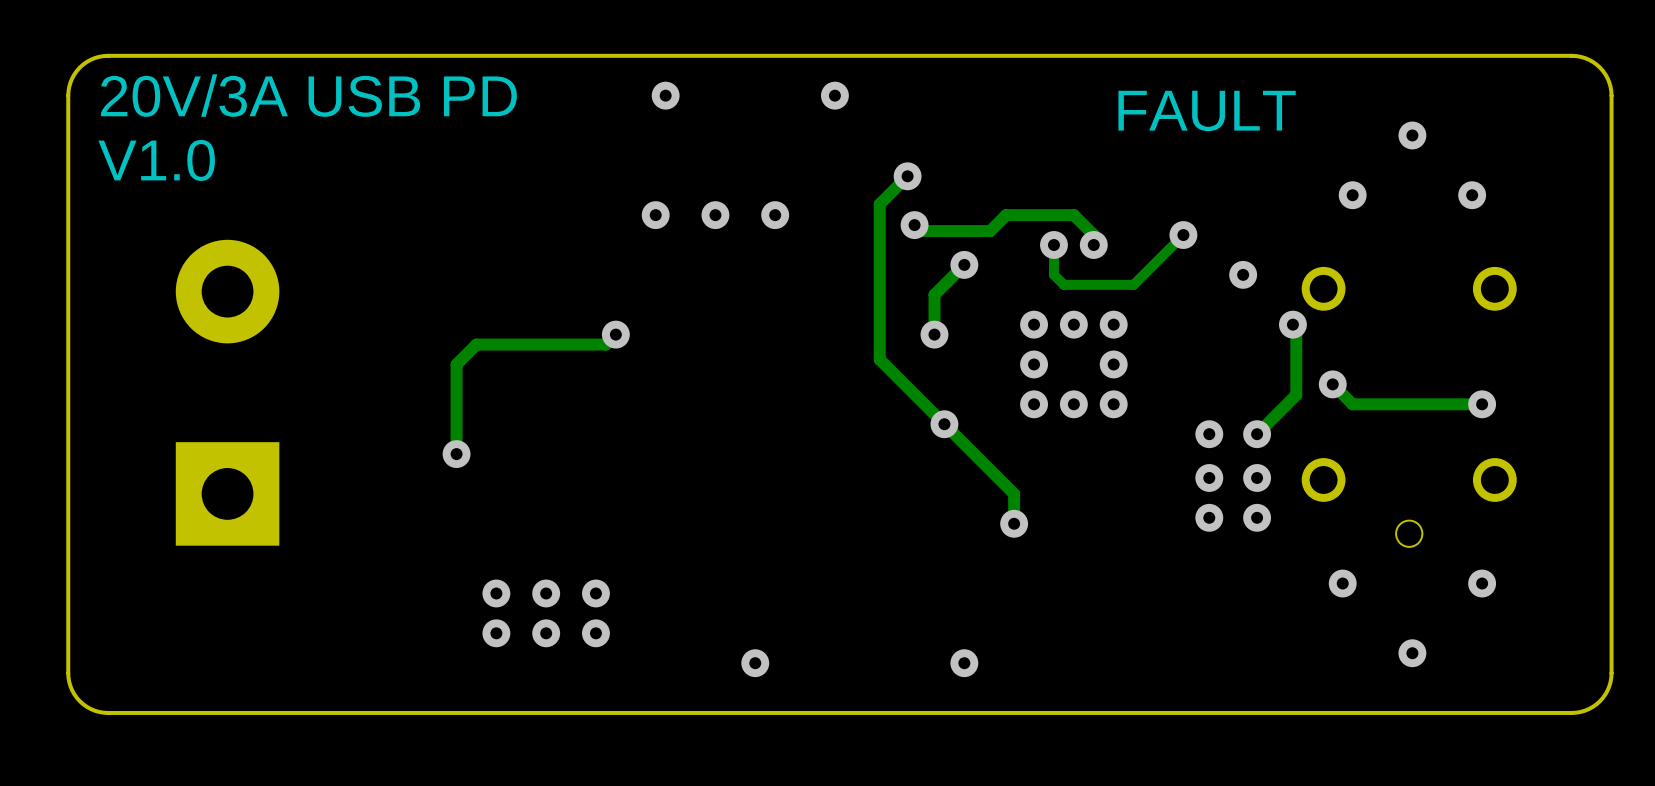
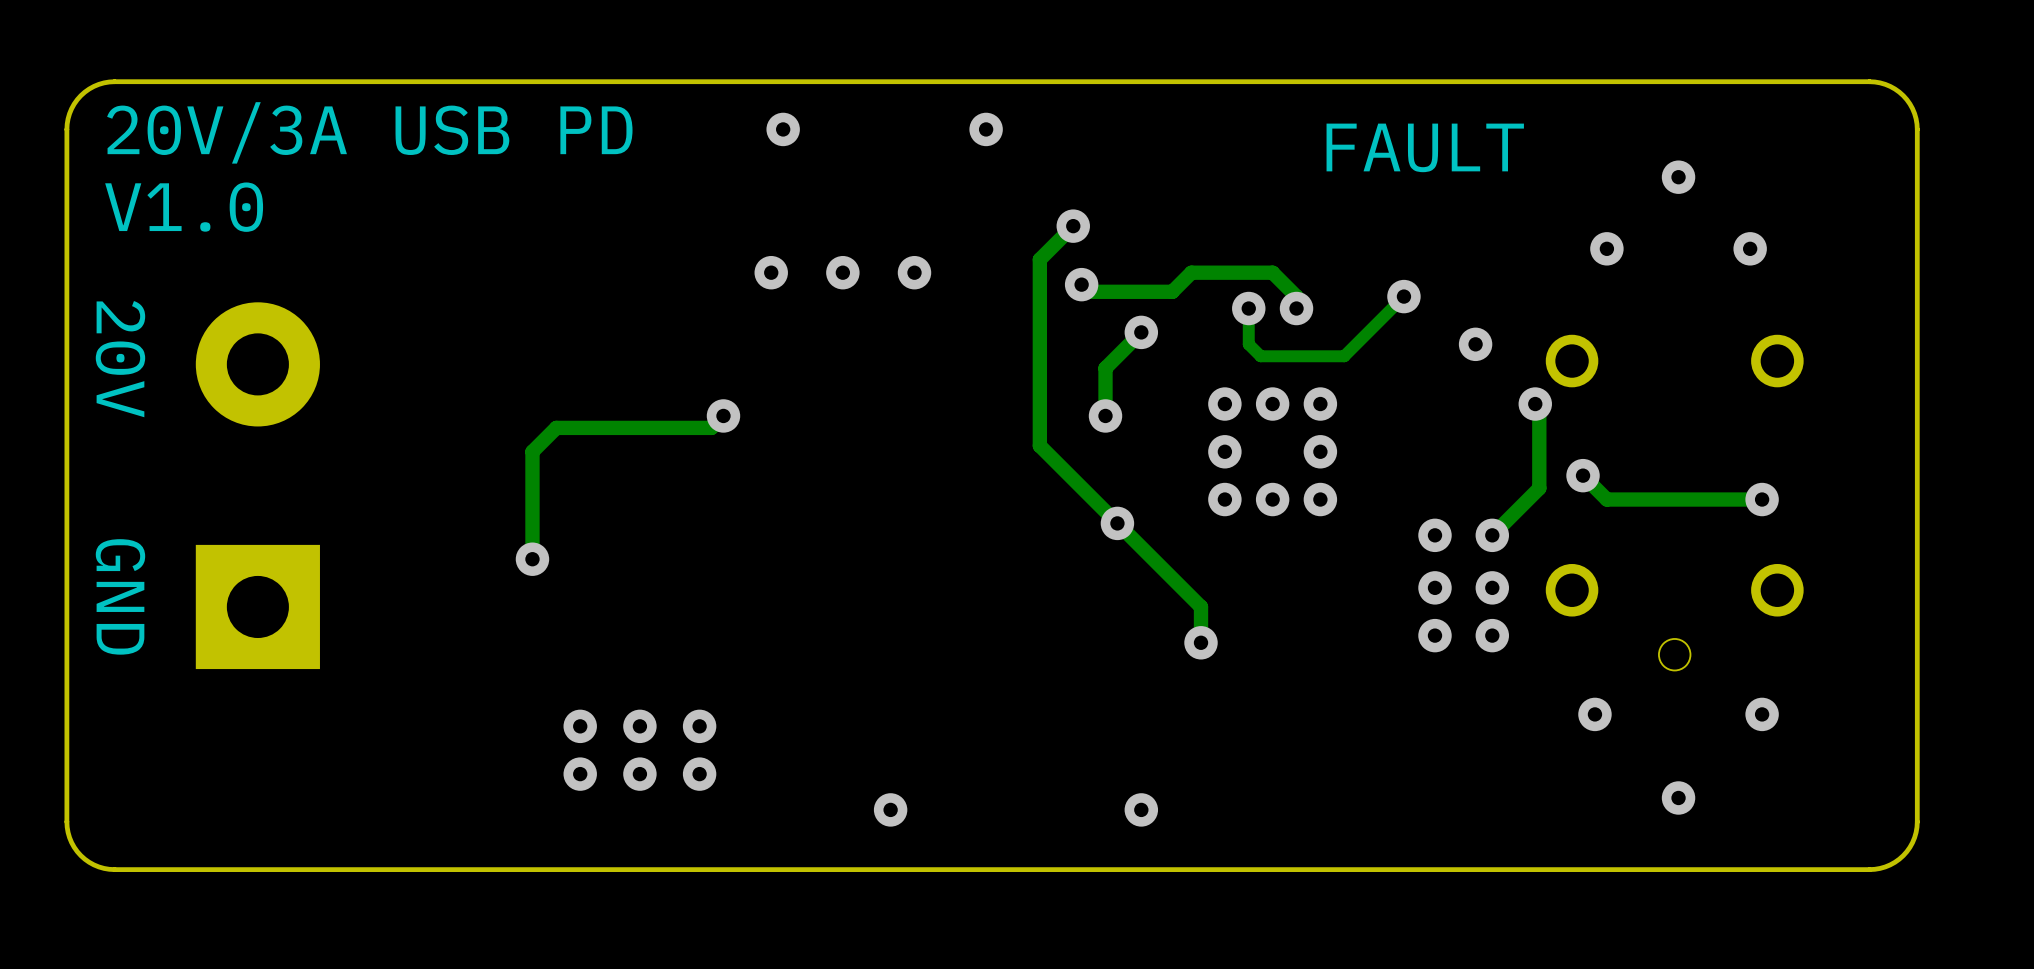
text: none -> 20V (120, 359)
text: none -> GND (120, 596)

